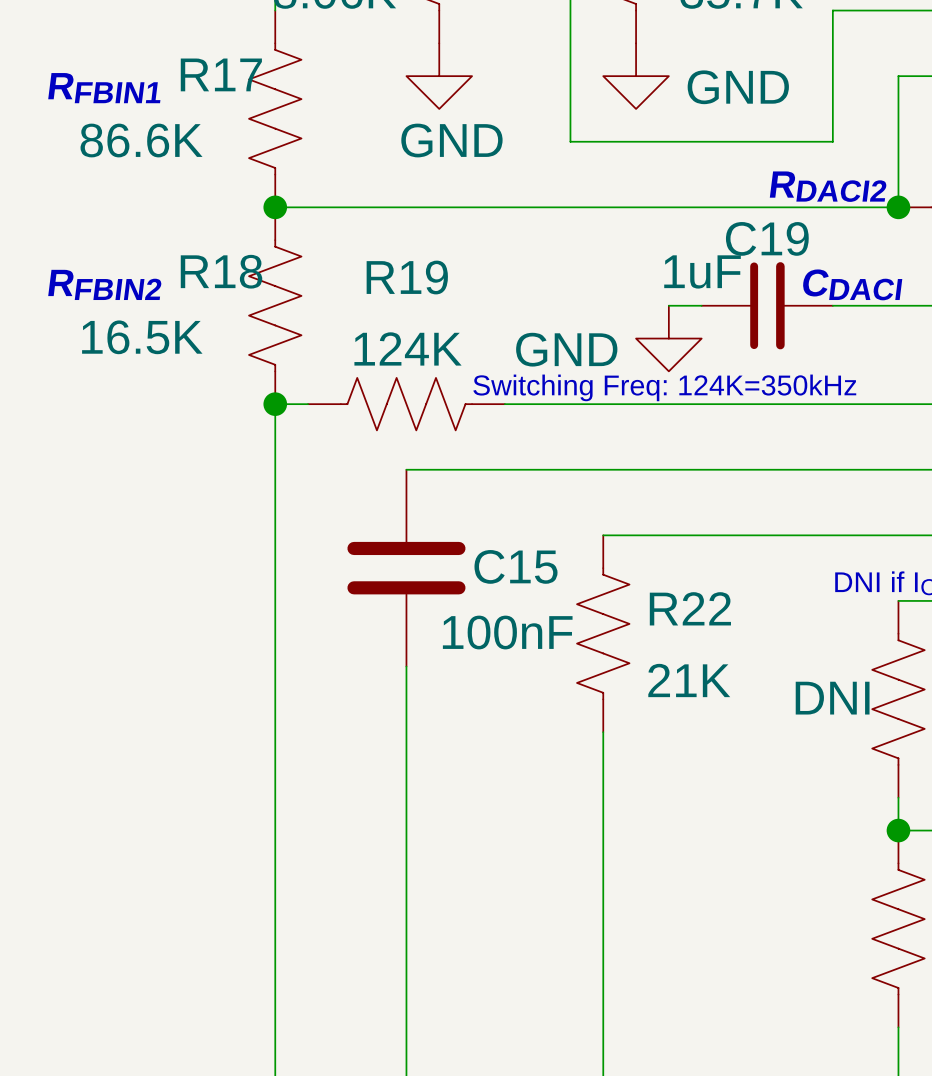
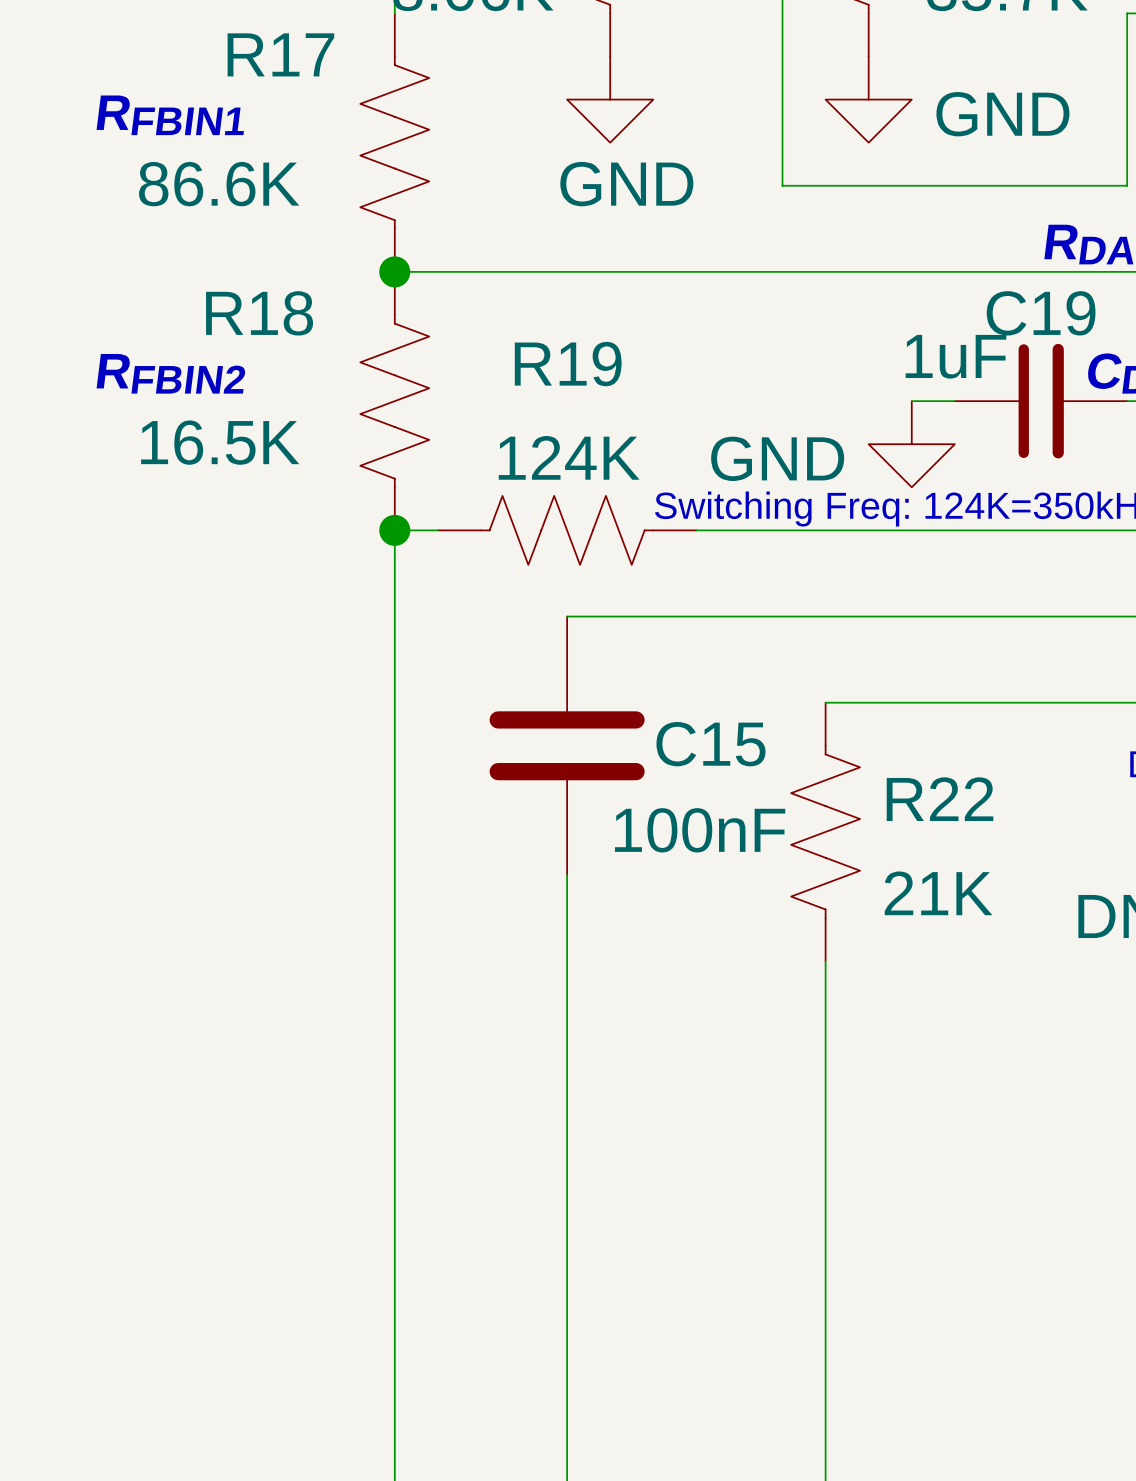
R17 name position: R17 (221, 74) -> R17 (280, 54)
R18 name position: R18 (221, 271) -> R18 (259, 313)

